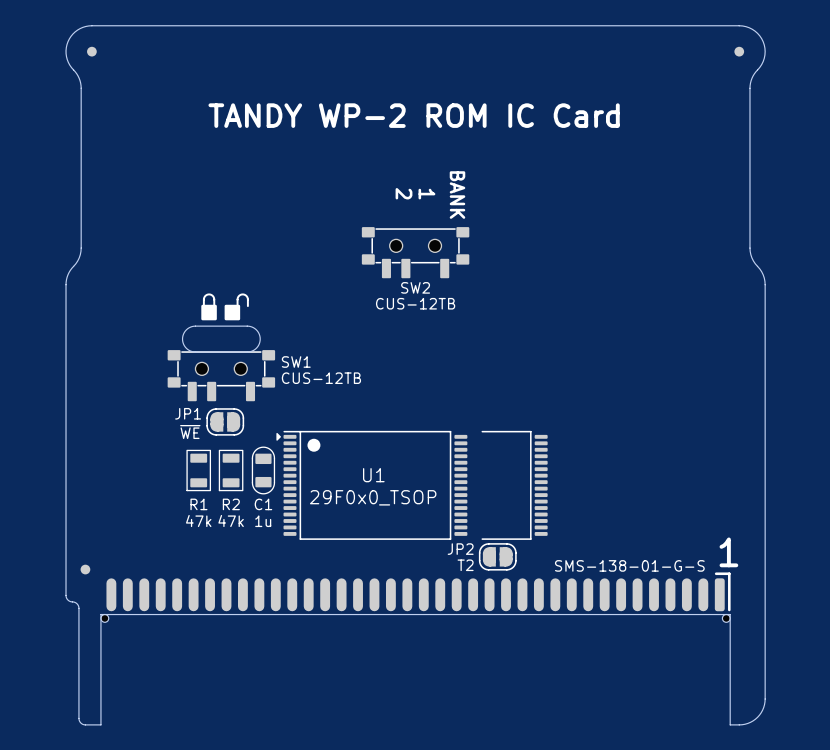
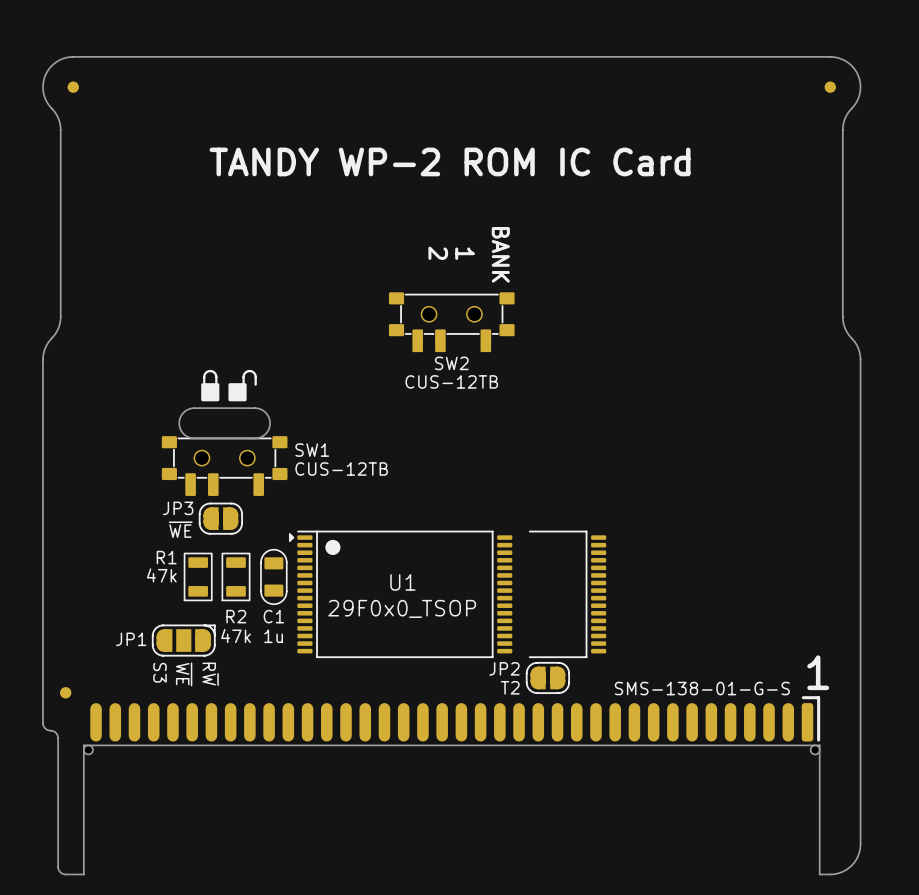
JP1 footprint: [206, 408, 245, 436] -> [151, 624, 216, 657]
JP3: none -> ~{WE} (220, 518)
JP1 value position: ~{WE} (190, 432) -> ~{WE} (184, 674)
R1 name position: R1 (198, 504) -> R1 (166, 557)
R1 value position: 47k (198, 521) -> 47k (161, 575)
JP1 text: none -> S3 (160, 672)
JP1 text: none -> R~{W} (210, 674)

